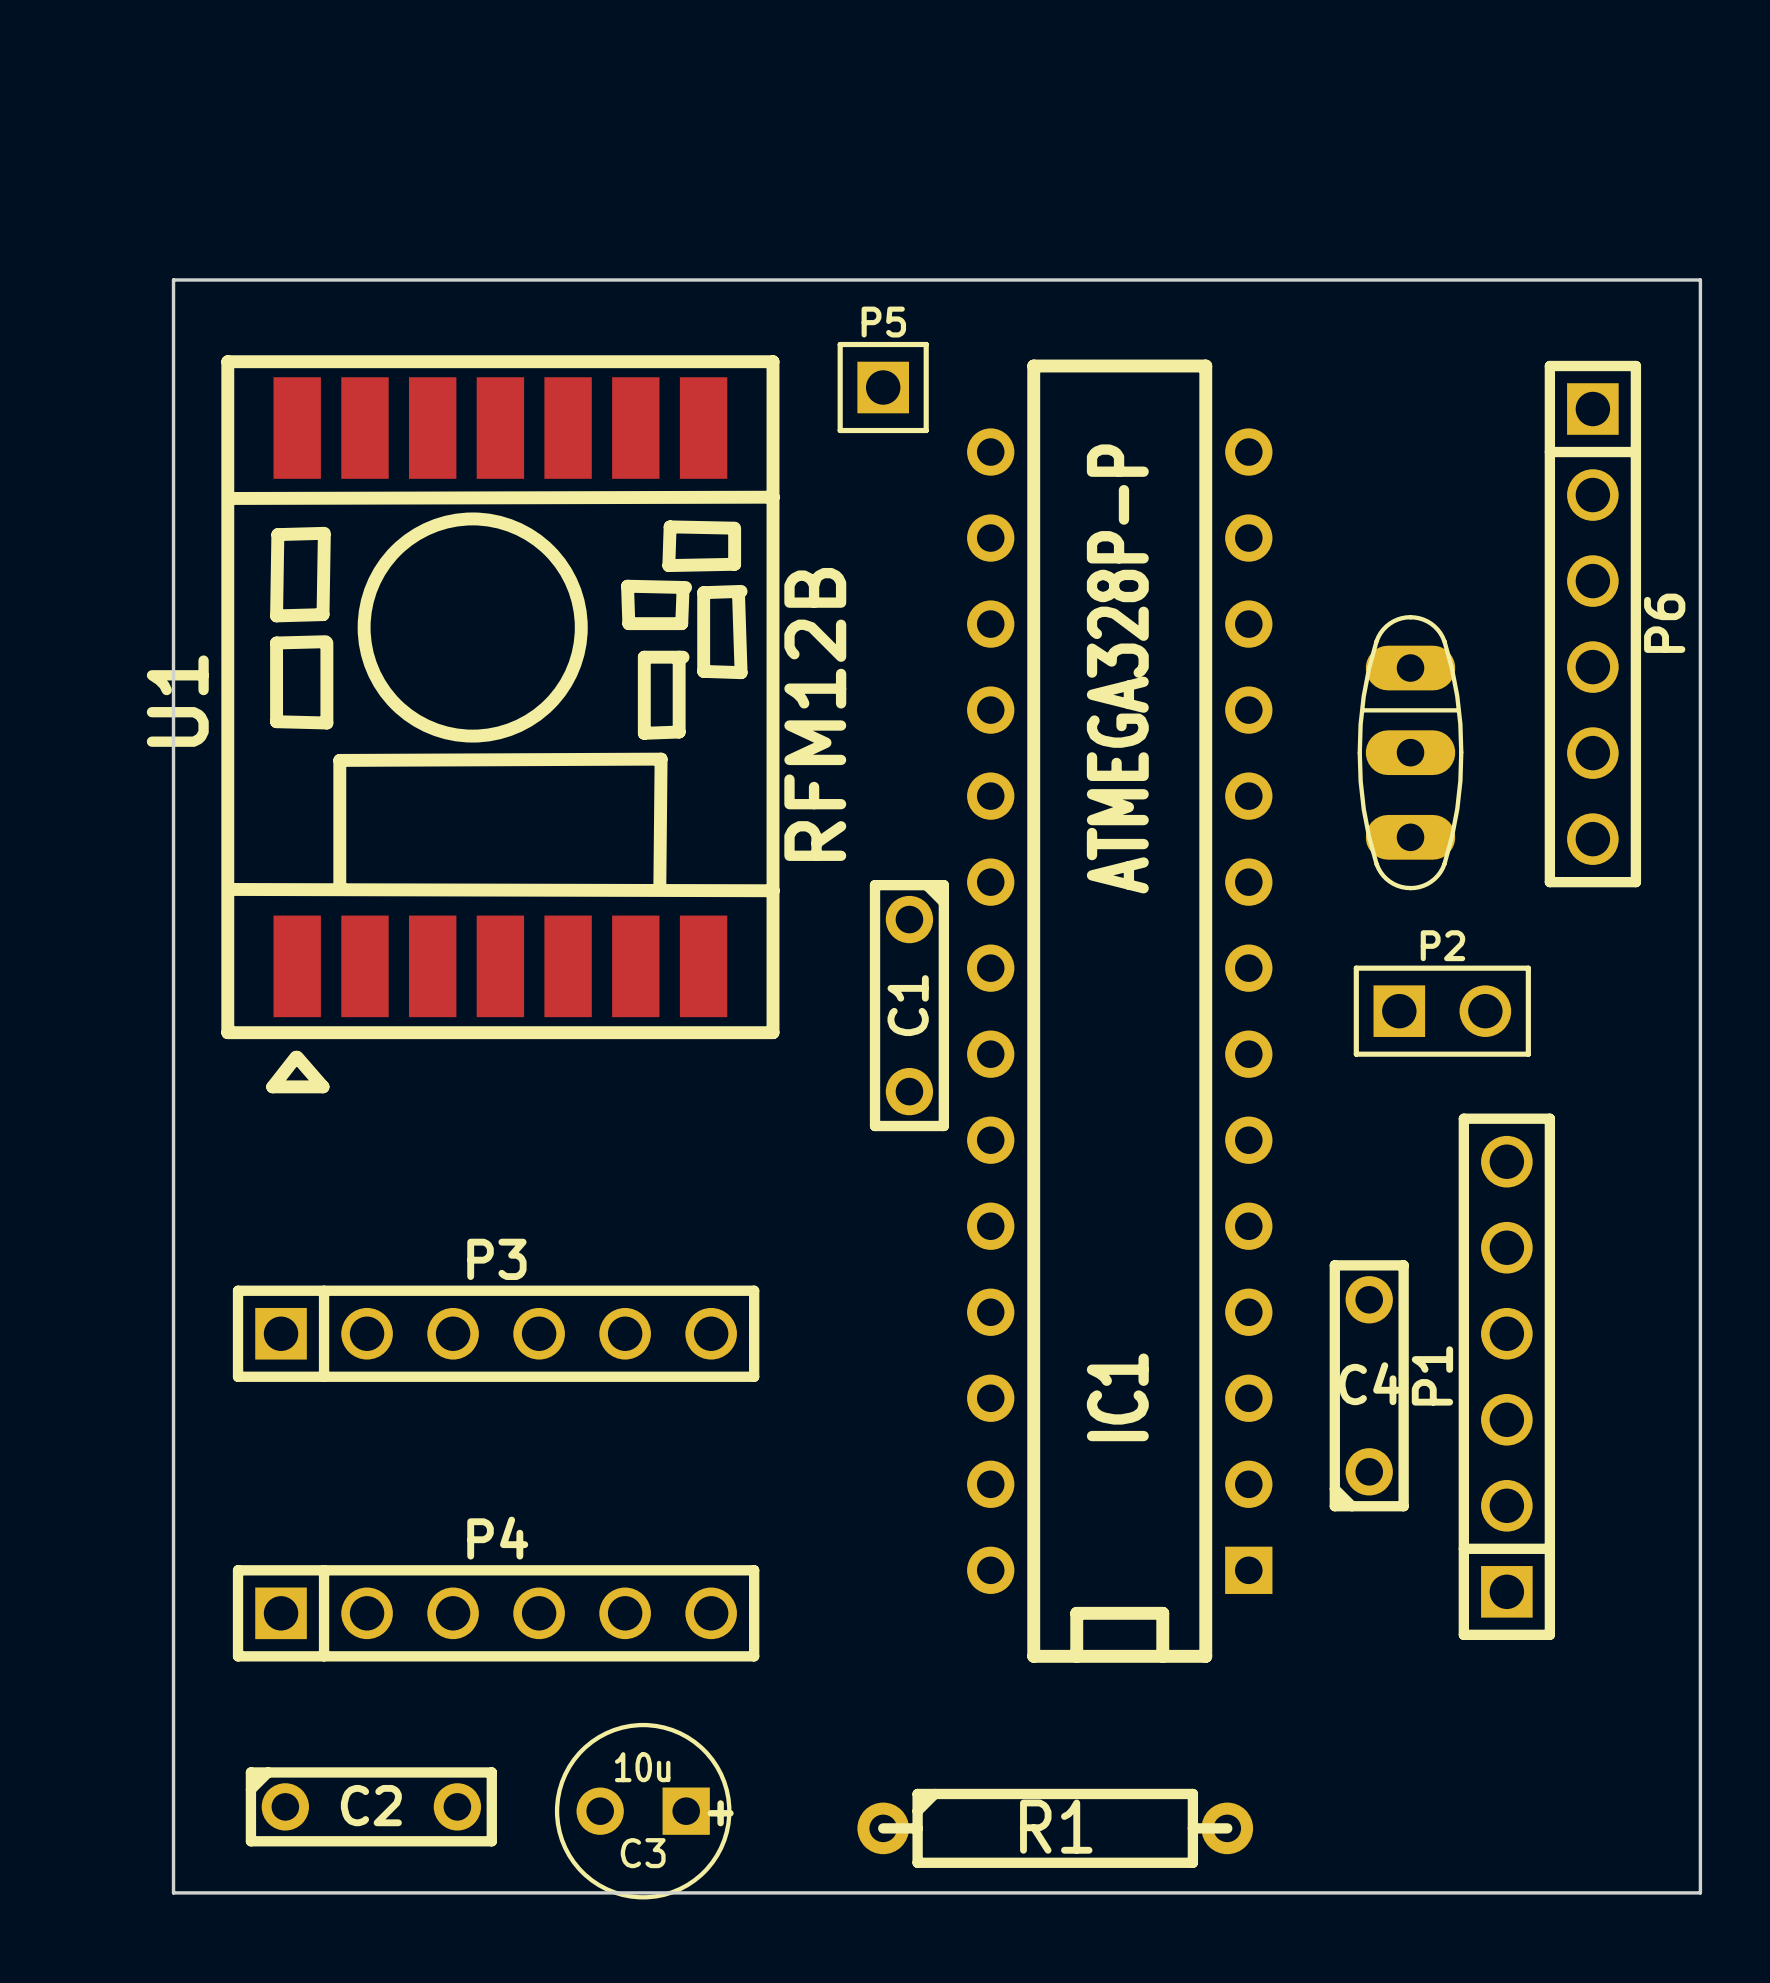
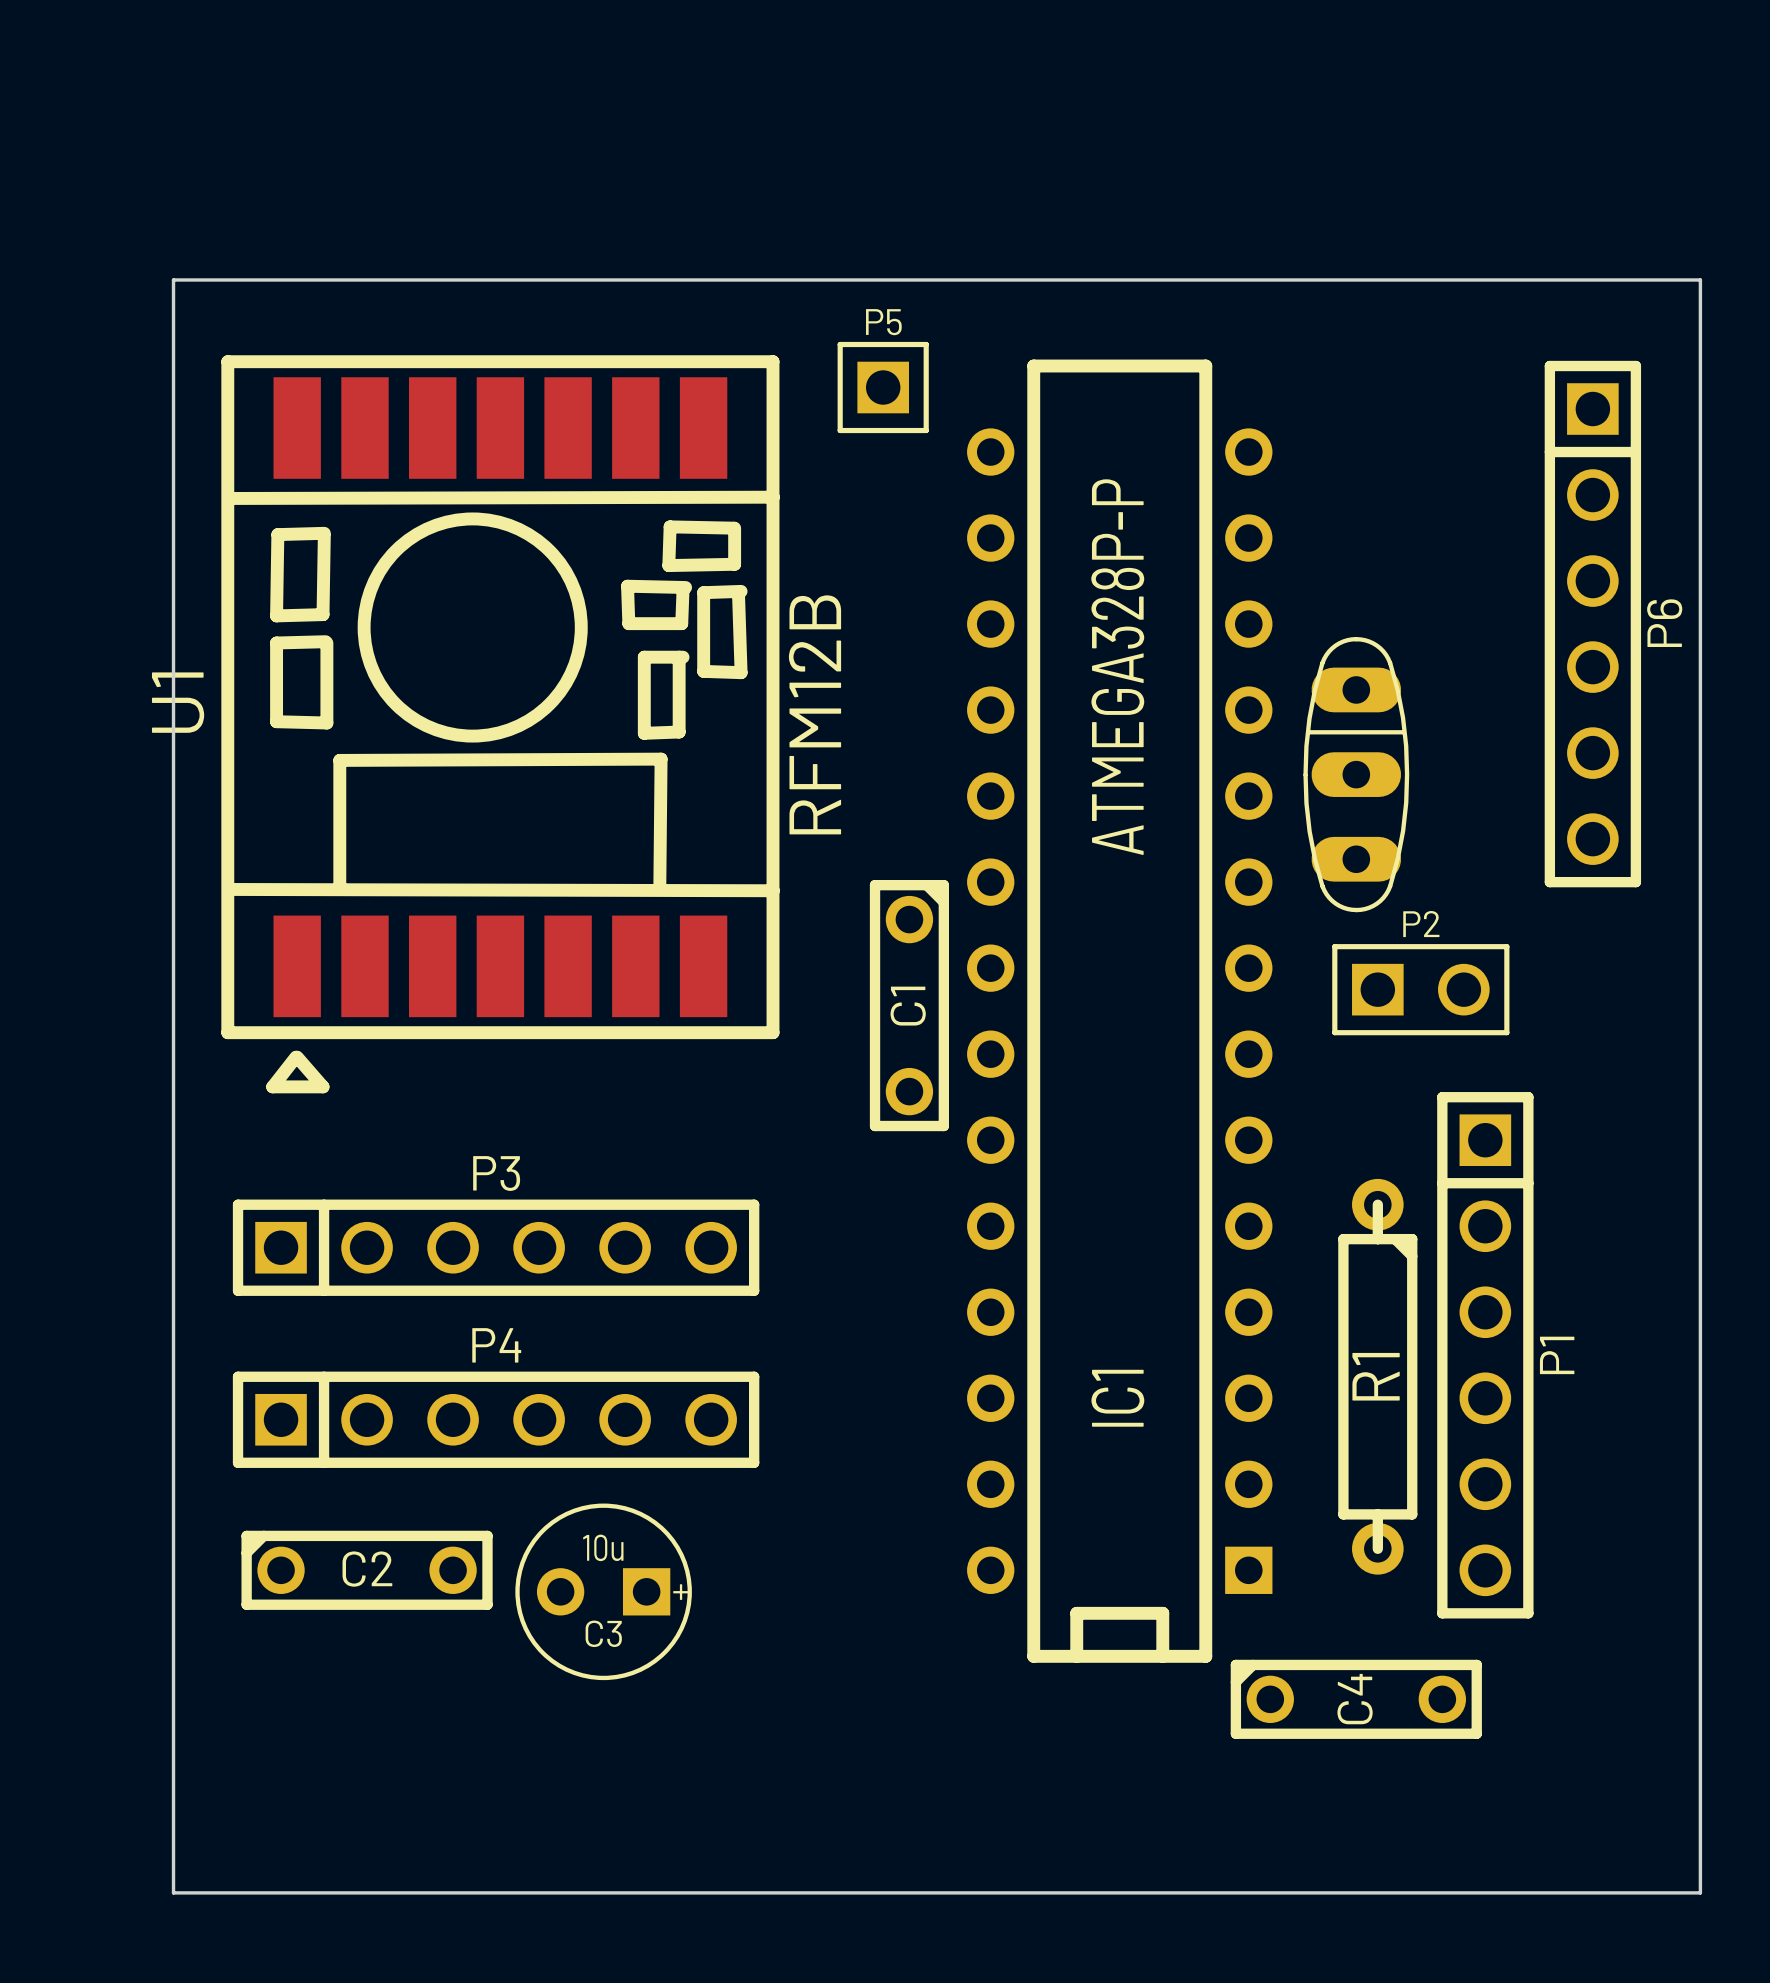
part position: (1410, 752) -> (1356, 774)
P2 position: (1442, 1011) -> (1420, 989)
P3 position: (496, 1333) -> (496, 1247)
P1 rotation: 0° (1506, 1376) -> 180° (1485, 1355)
C4 rotation: 0° (1369, 1385) -> 90° clockwise (1356, 1699)
C4 position: (1369, 1385) -> (1356, 1699)
P4 position: (496, 1613) -> (496, 1419)
C2 position: (371, 1806) -> (367, 1570)
C3 position: (643, 1811) -> (603, 1591)
R1 rotation: 0° (1055, 1828) -> 90° clockwise (1377, 1376)
R1 position: (1055, 1828) -> (1377, 1376)

